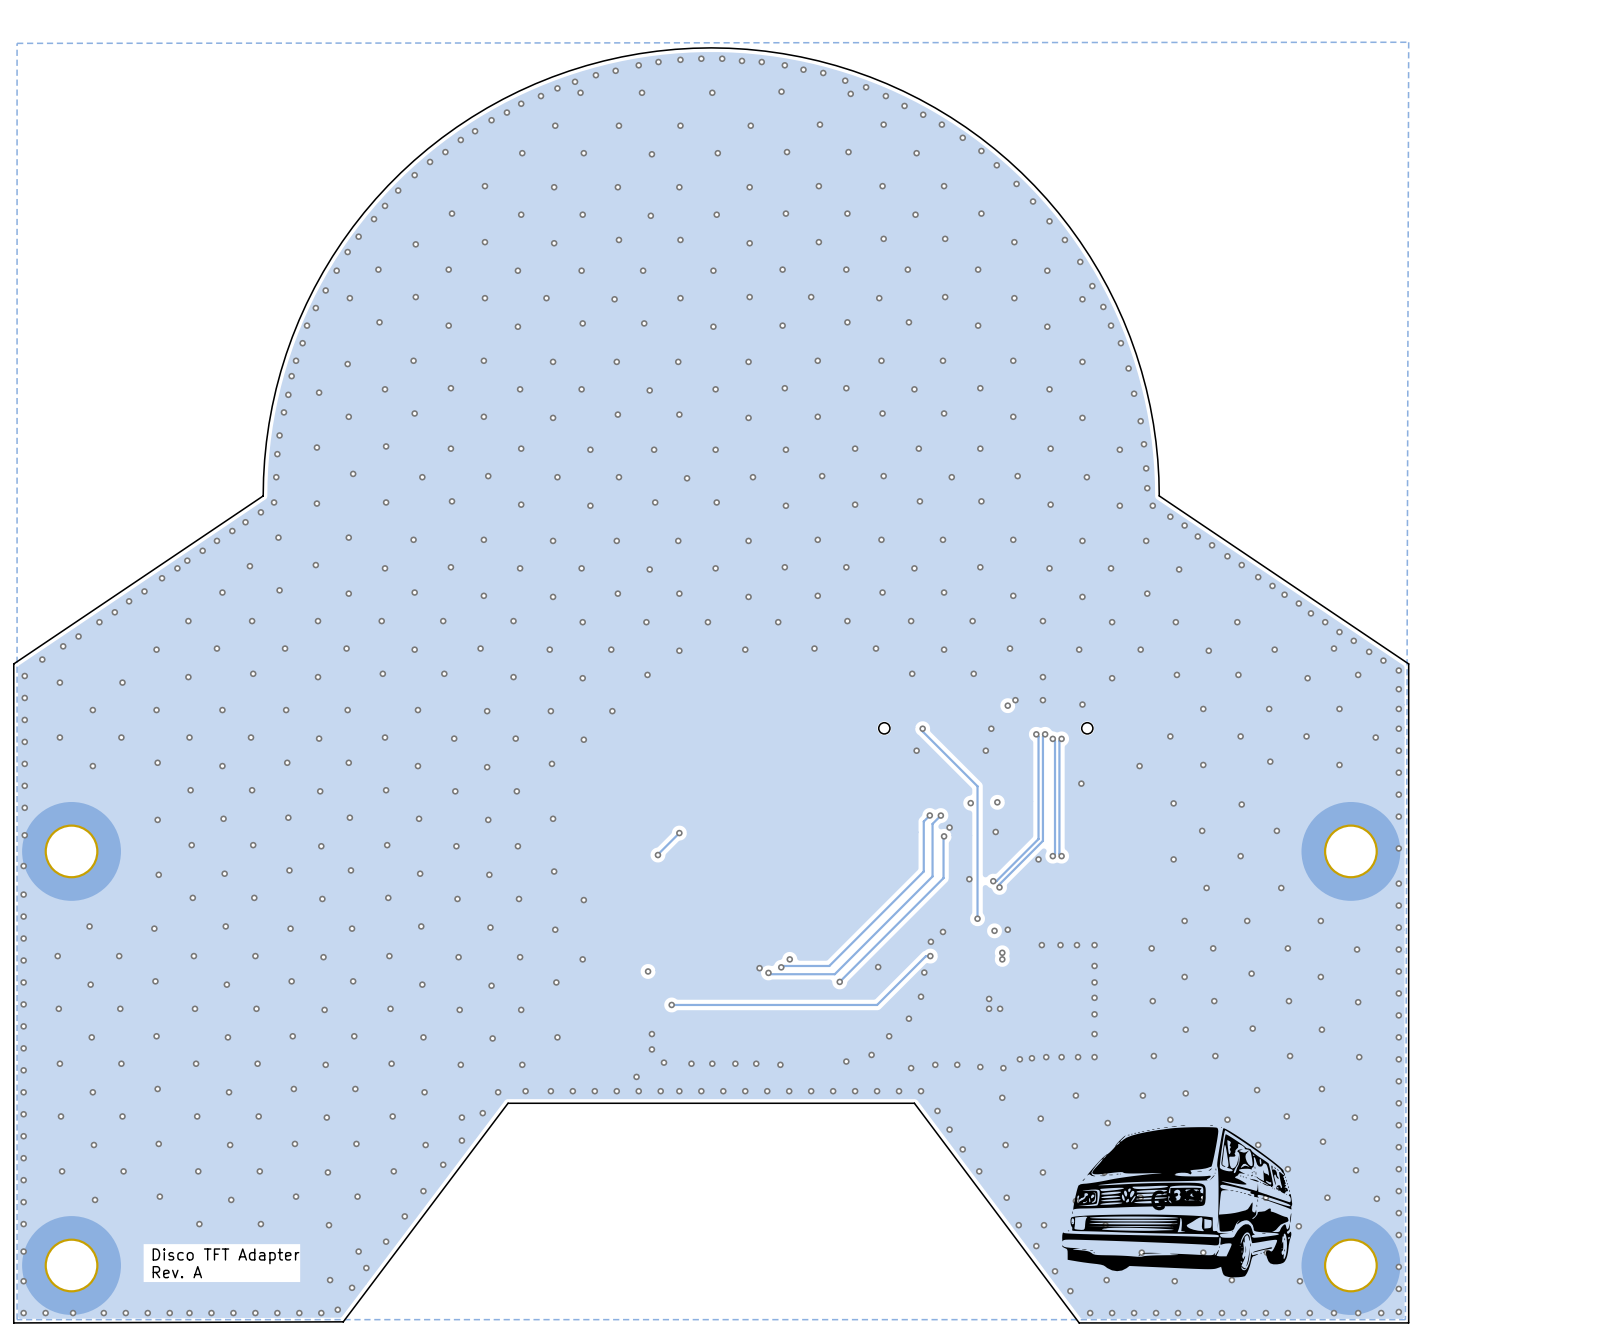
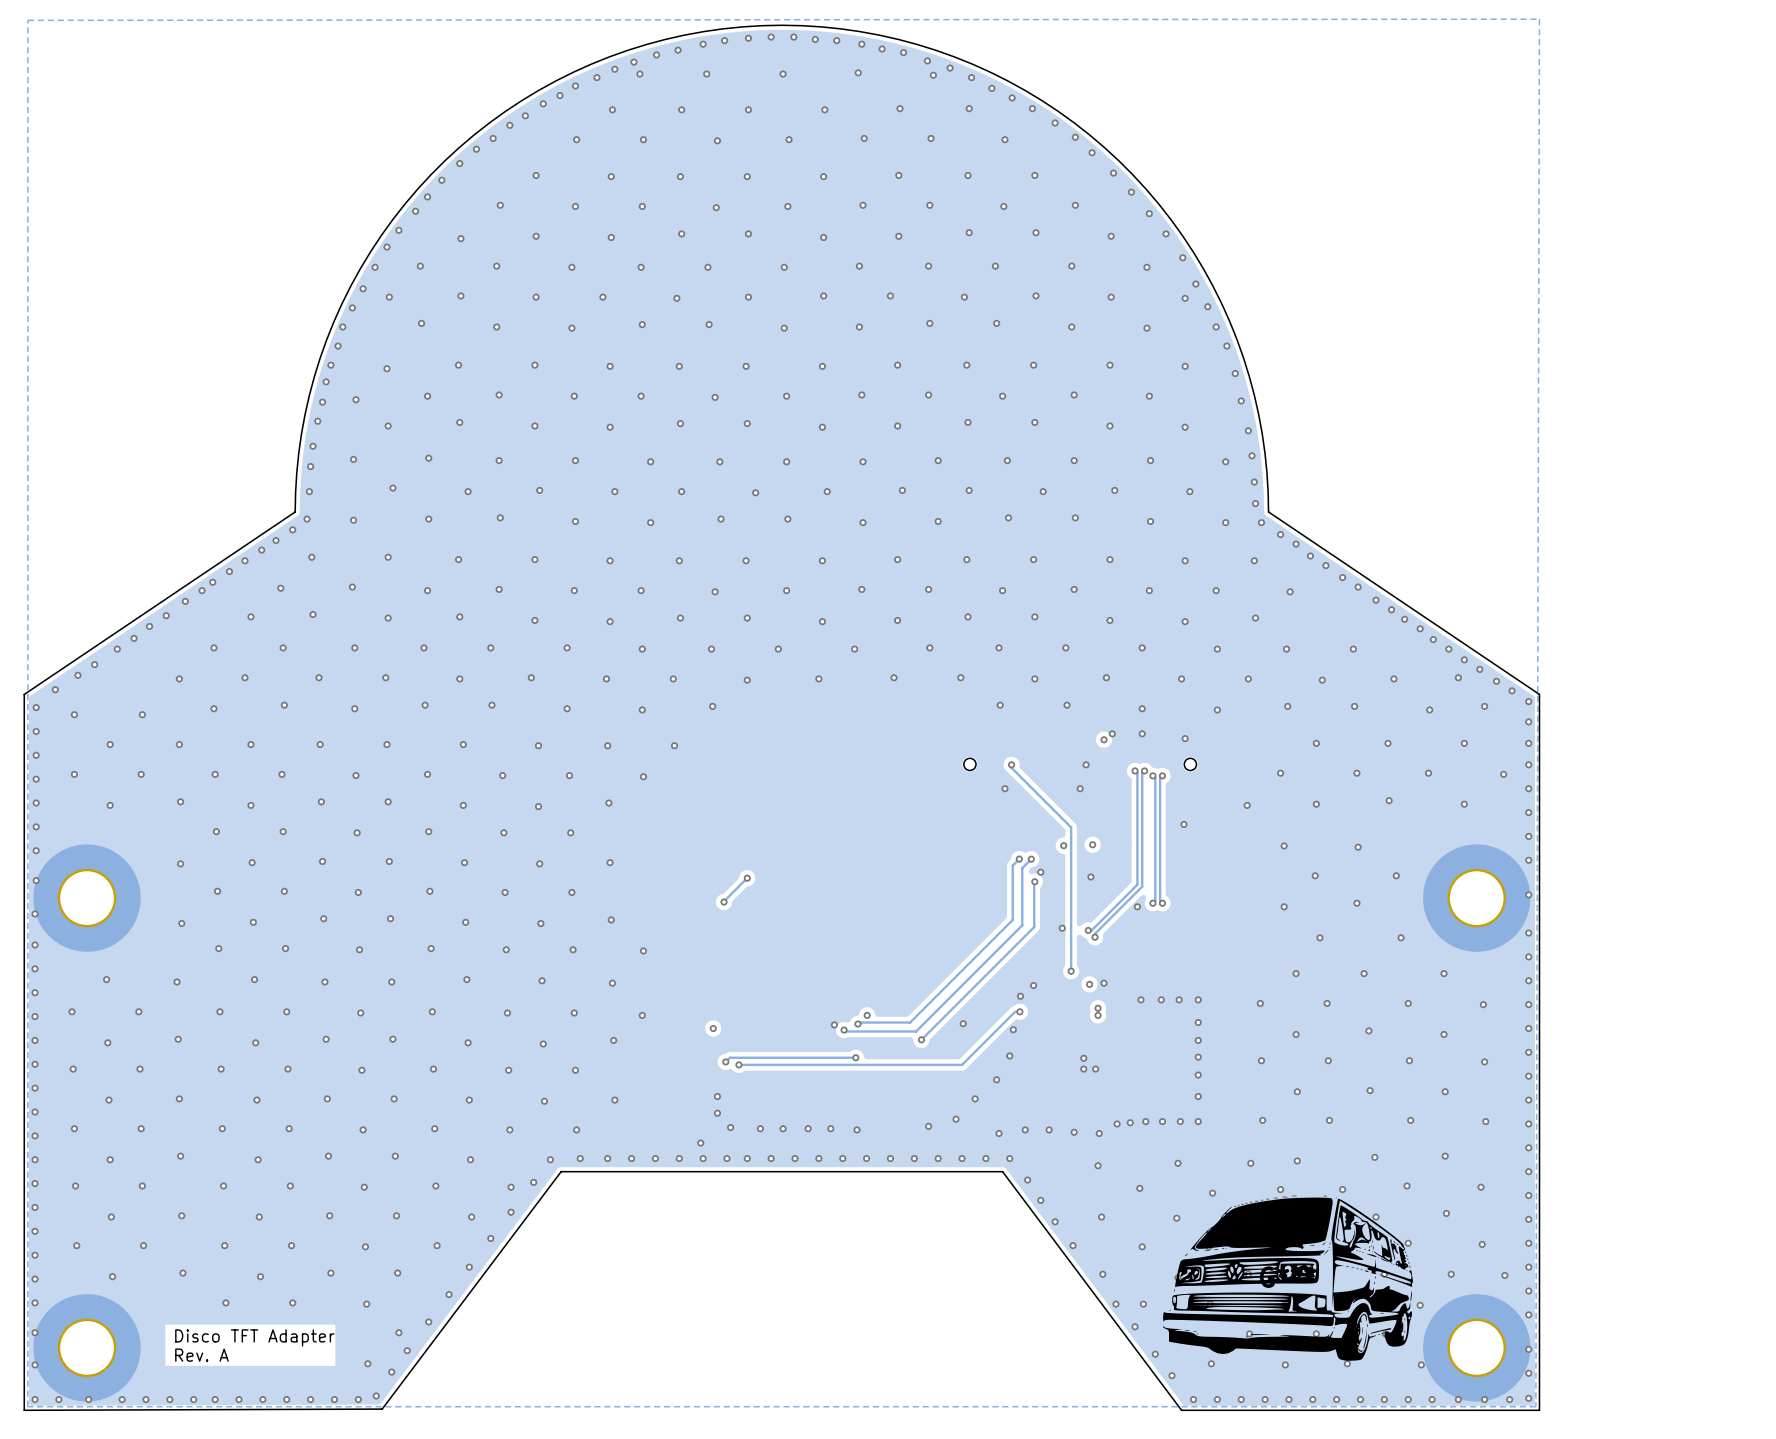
track: none -> (855, 1057) (729, 1057) (725, 1061)
via: none -> (855, 1057)
via: none -> (725, 1061)

